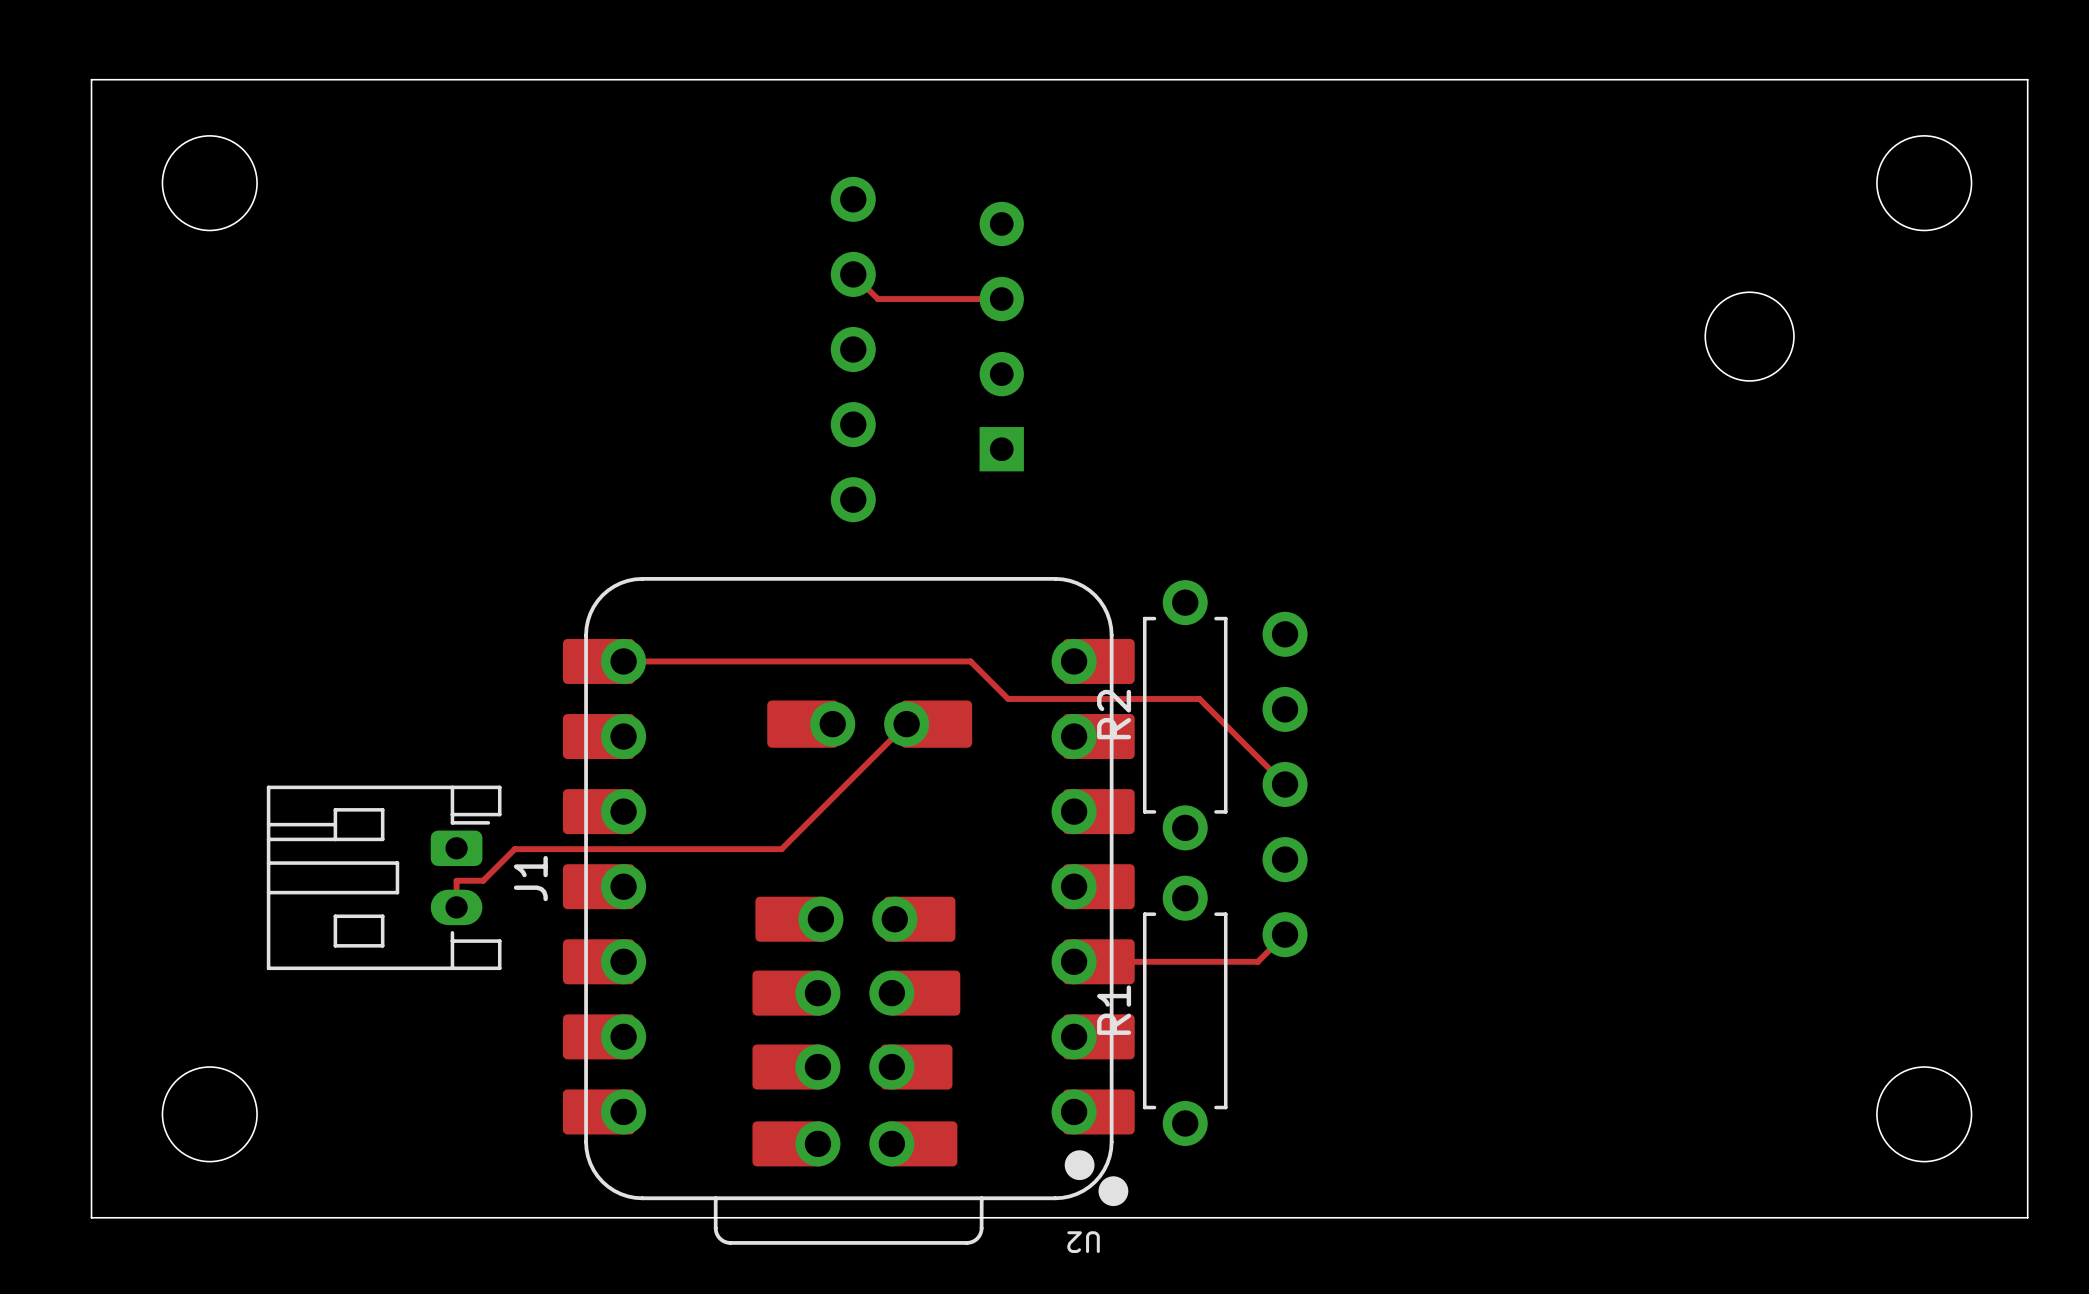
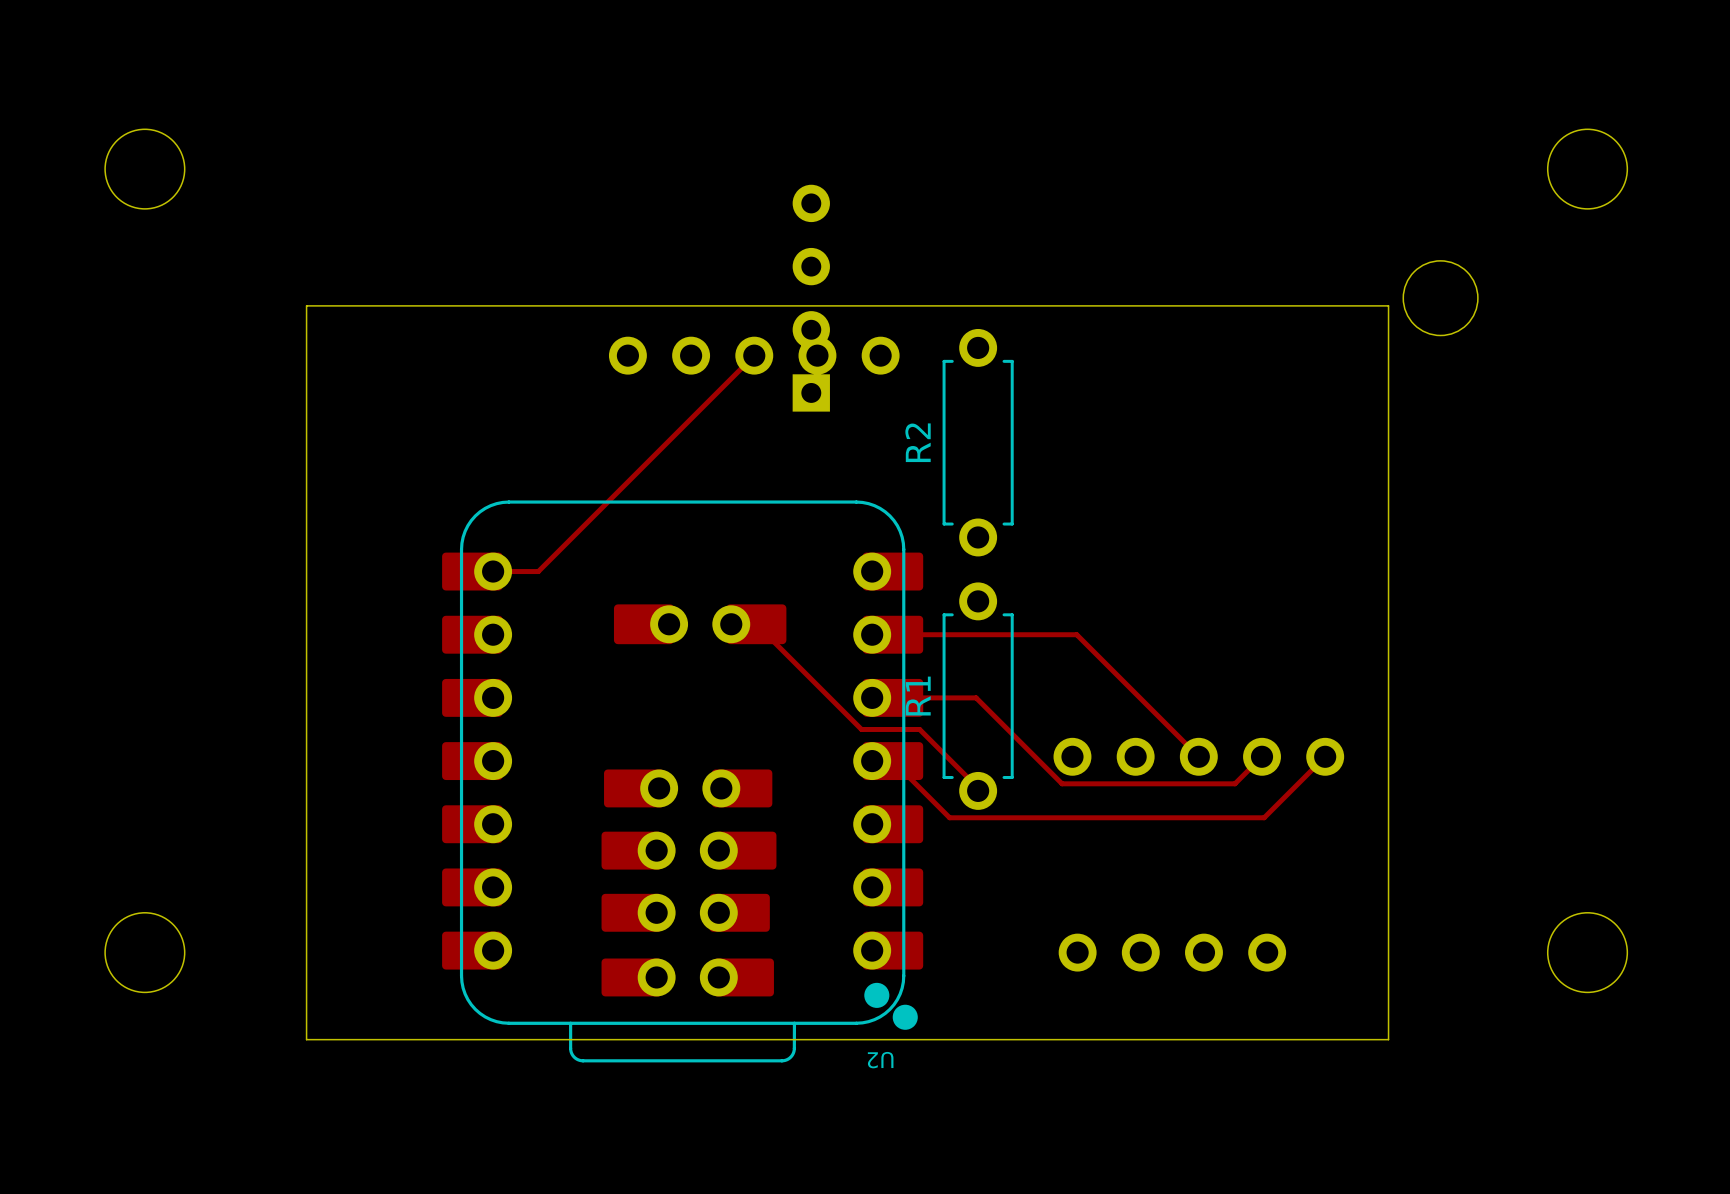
track: (853, 274) (877, 299) (1001, 299) -> none
part rotation: 0° (853, 349) -> 90° clockwise (754, 355)
track: (677, 661) (970, 661) (1008, 699) (1199, 699) (1285, 784) -> (538, 571) (754, 355)
R2 position: (1185, 715) -> (978, 442)
track: (906, 724) (781, 849) (514, 849) (483, 880) (456, 880) (456, 907) -> none
track: none -> (756, 624) (861, 729) (919, 729) (978, 787) (978, 790)
track: none -> (892, 634) (1076, 634) (1198, 756)
part rotation: 0° (1285, 784) -> 90° clockwise (1198, 756)
track: none -> (892, 697) (976, 697) (1062, 783) (1234, 783) (1262, 756)
J1: (384, 877) -> none
track: none -> (1325, 756) (1264, 817) (949, 817) (892, 761)
track: (1285, 934) (1257, 961) (1098, 961) -> none
R1 position: (1185, 1010) -> (978, 696)
part: none -> (1172, 952)
board edge: (401, 1217) (91, 1217) (91, 79) (2027, 79) (2027, 1217) (1687, 1217) -> (306, 1039) (306, 305) (1388, 305) (1388, 1039)

